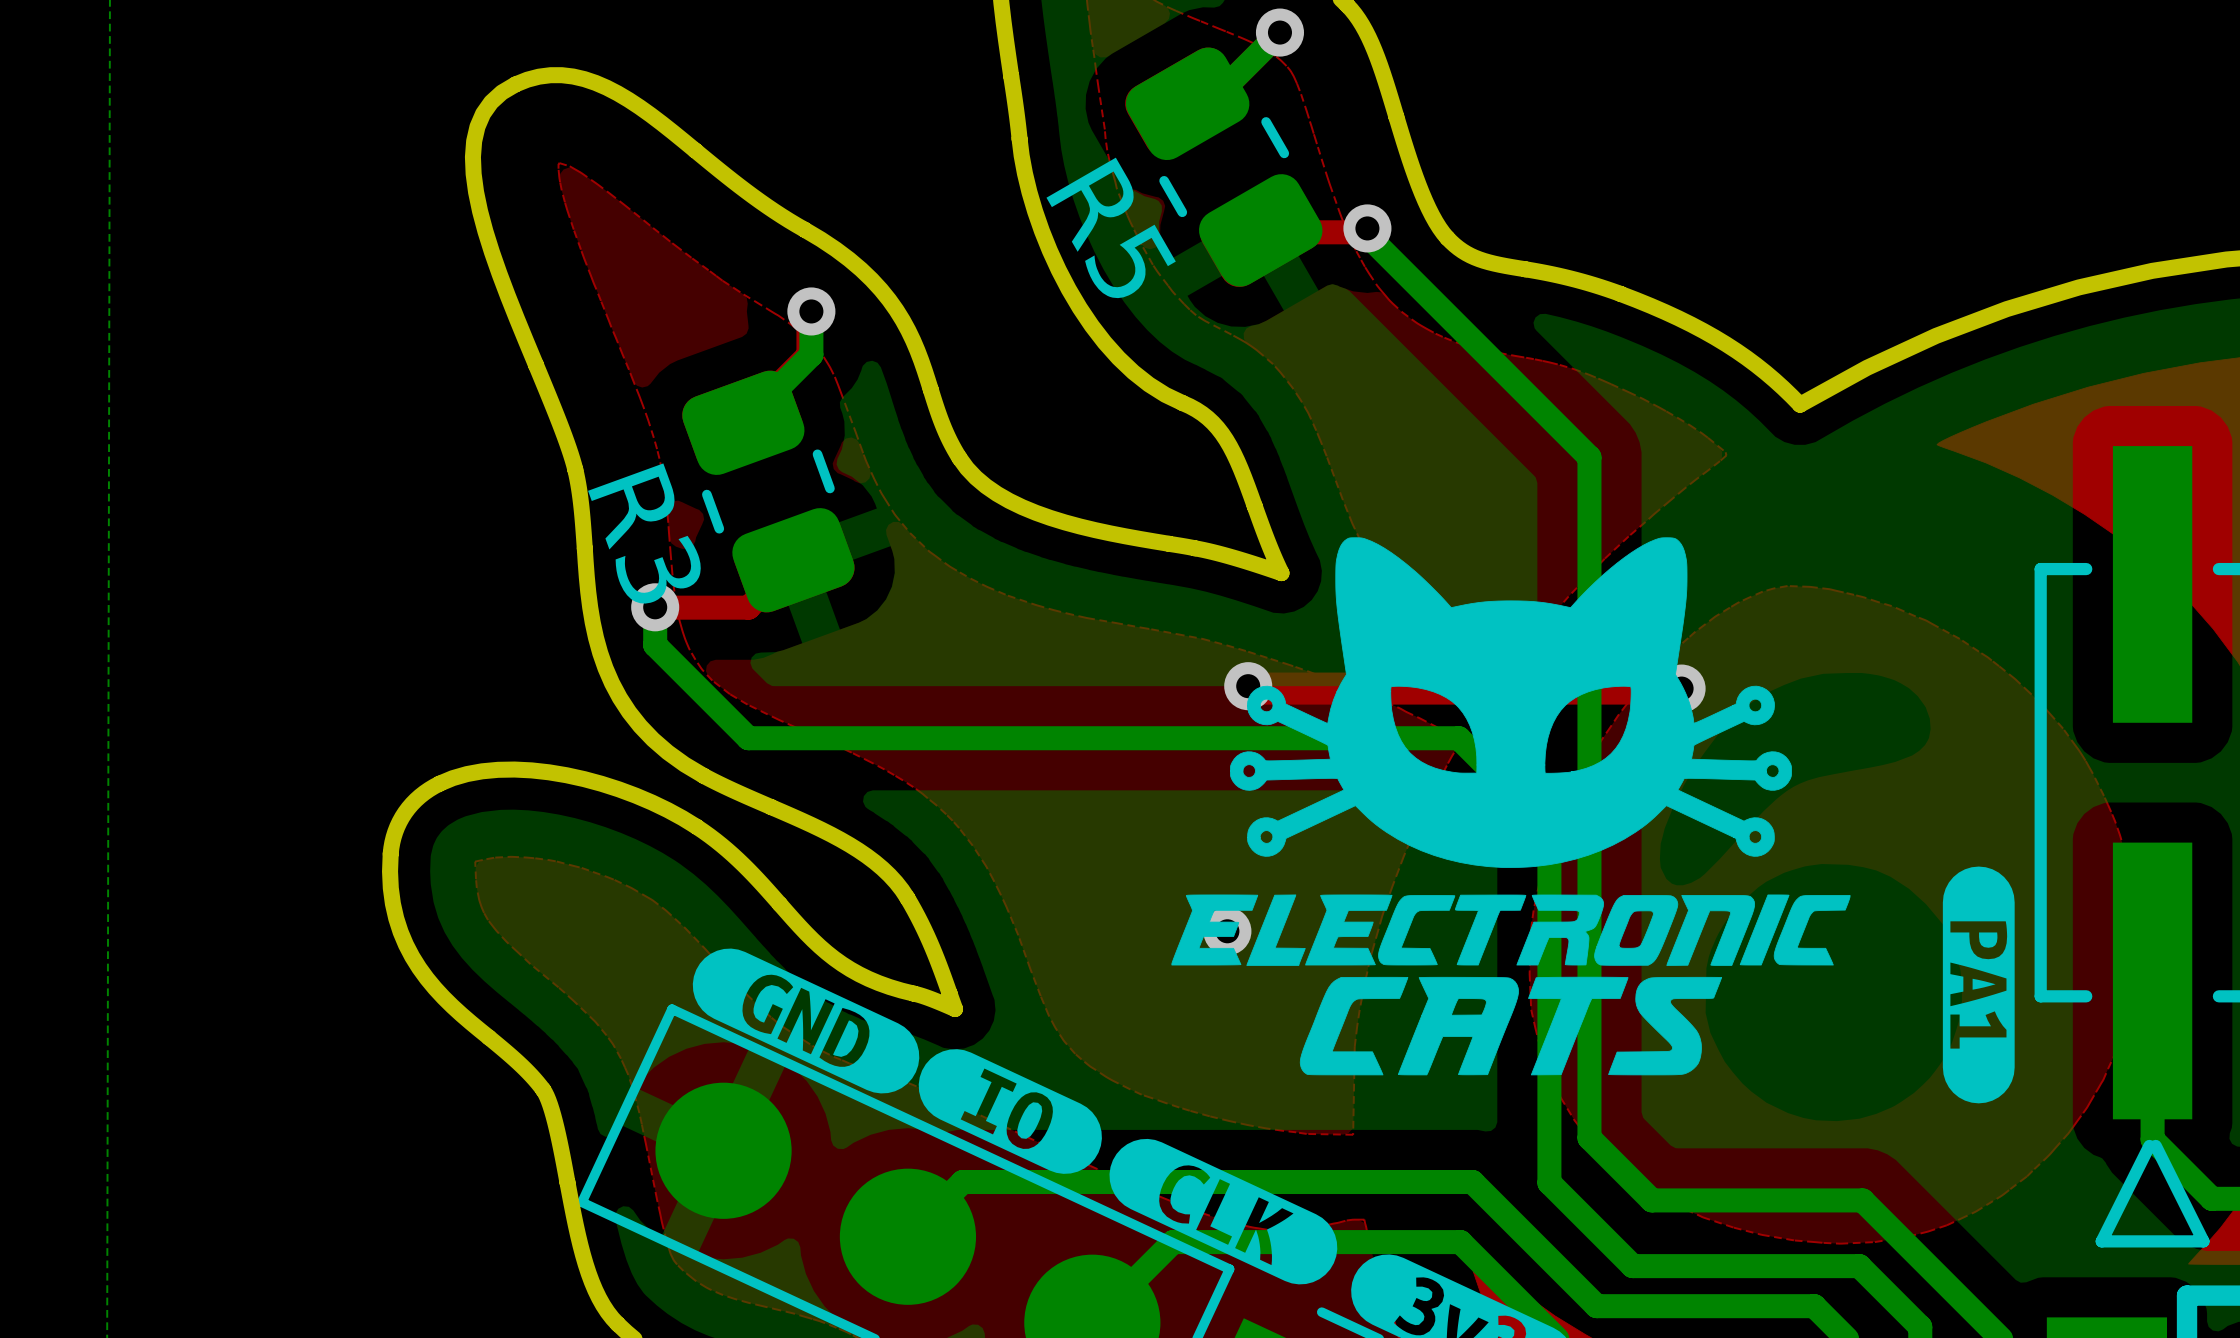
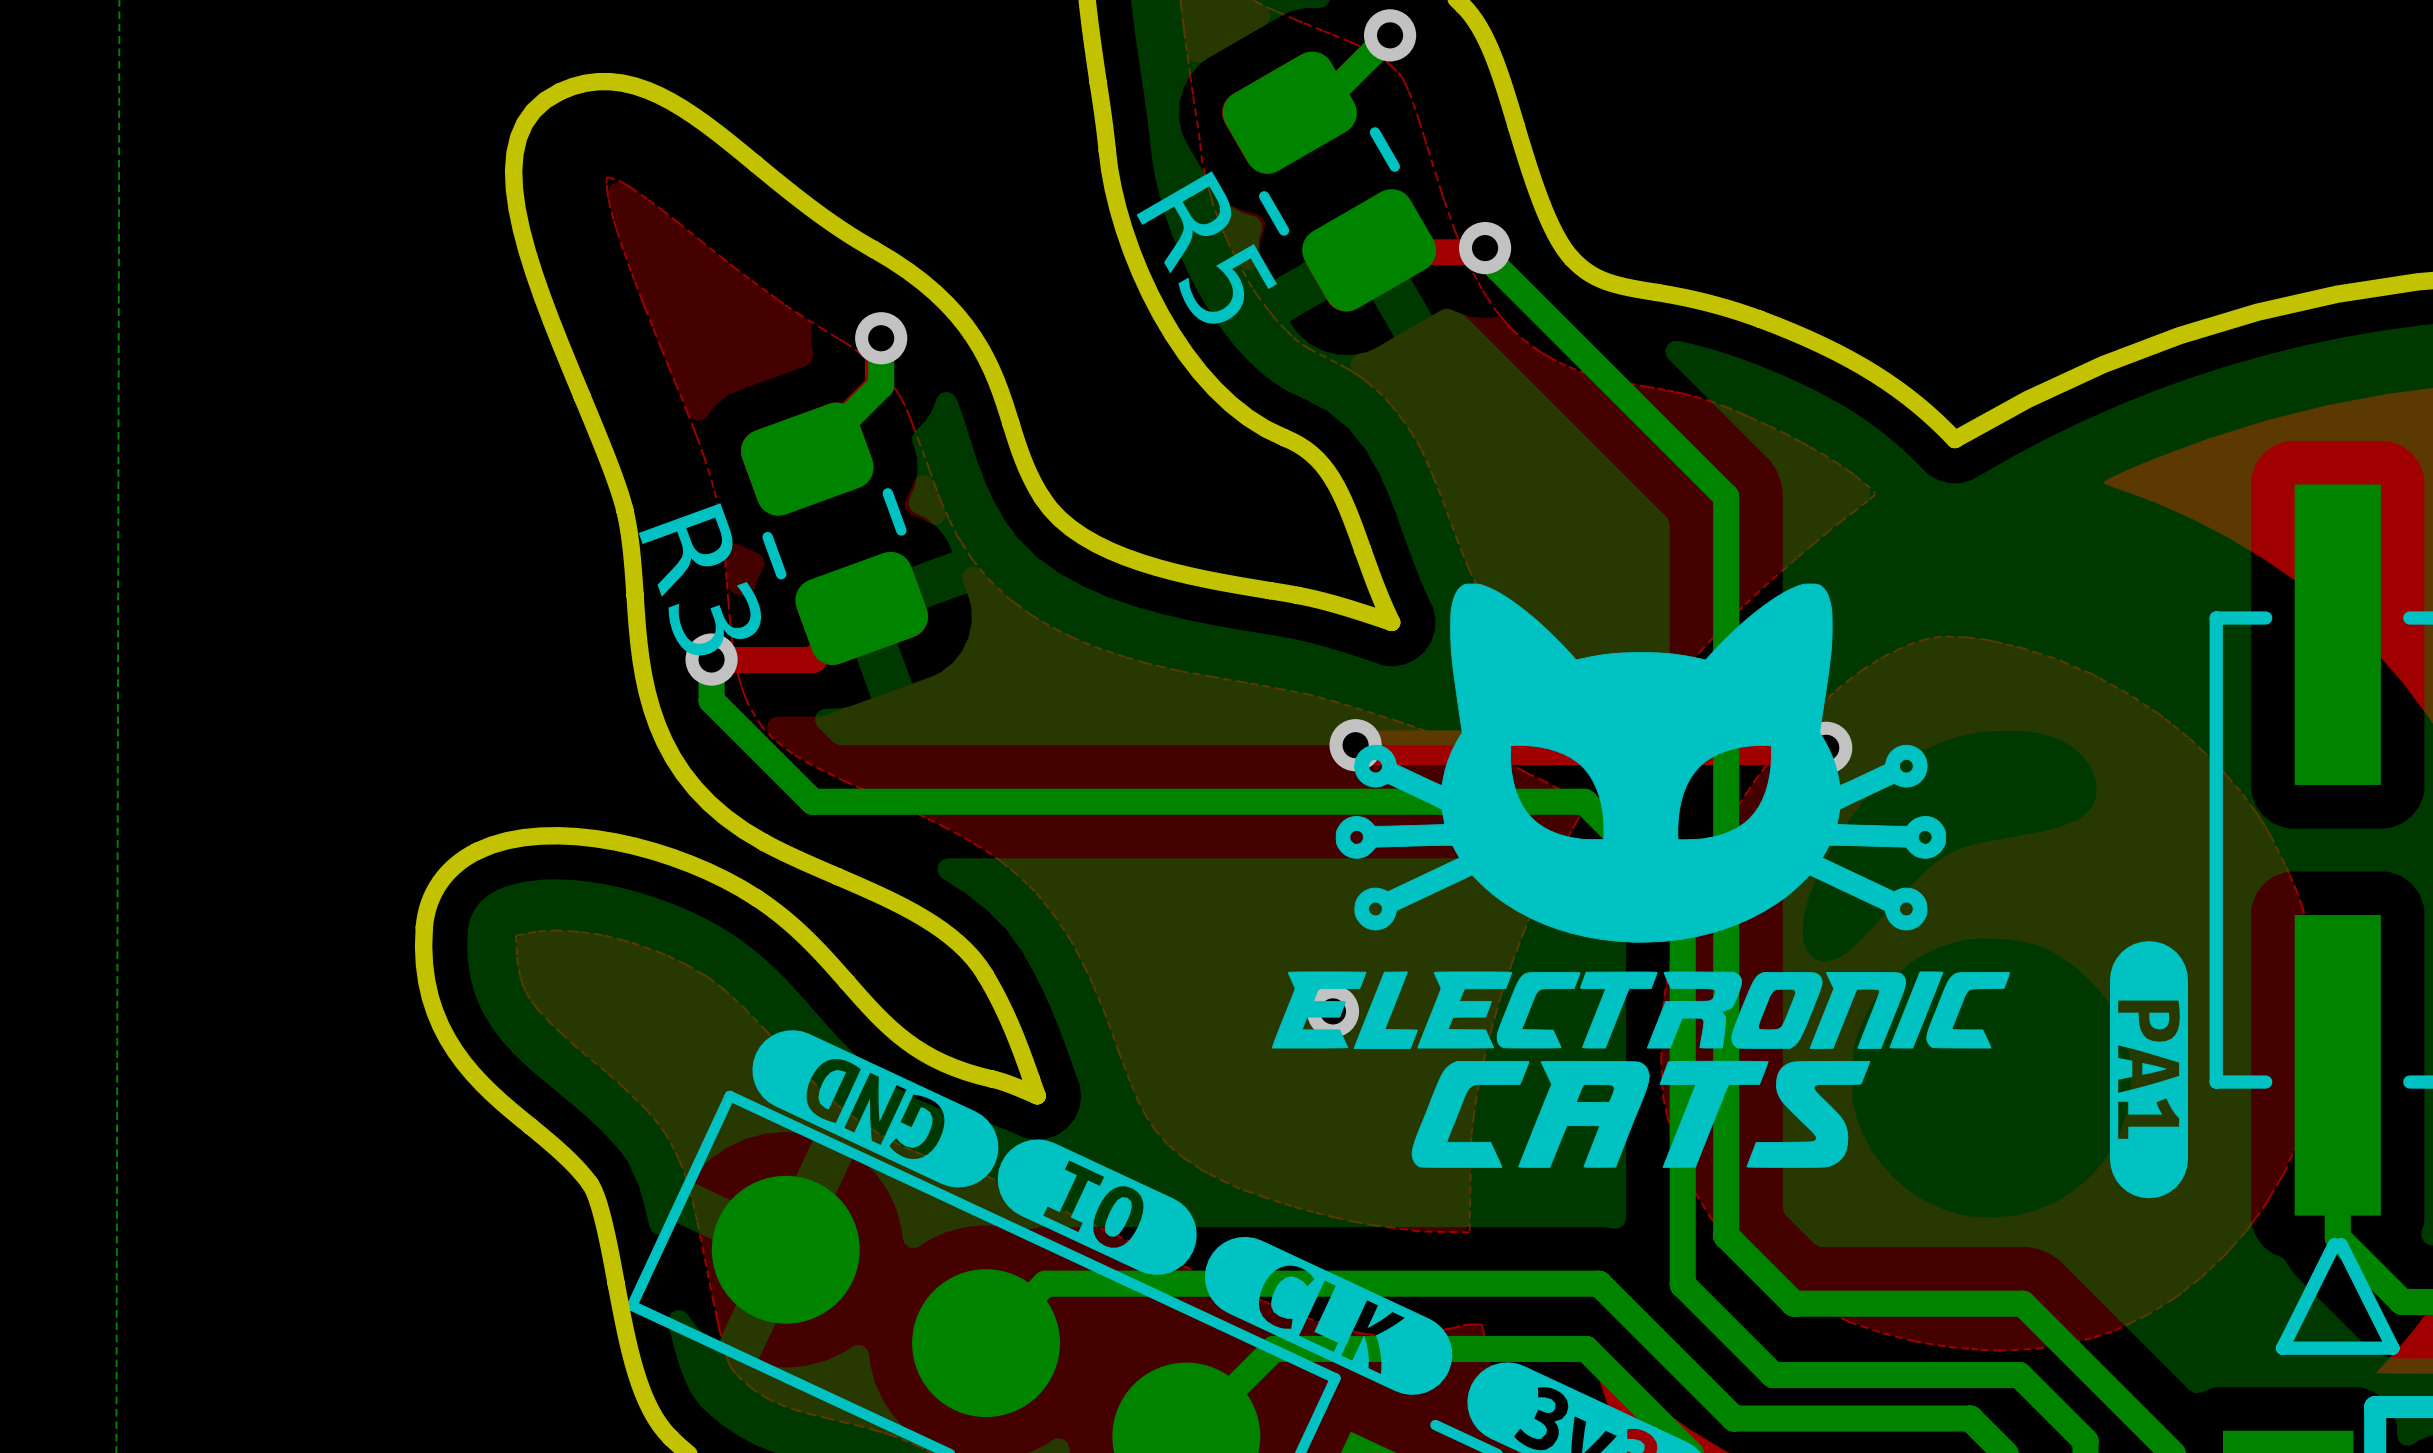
drawing shape: [692, 948, 920, 1094] -> [752, 1030, 999, 1188]

